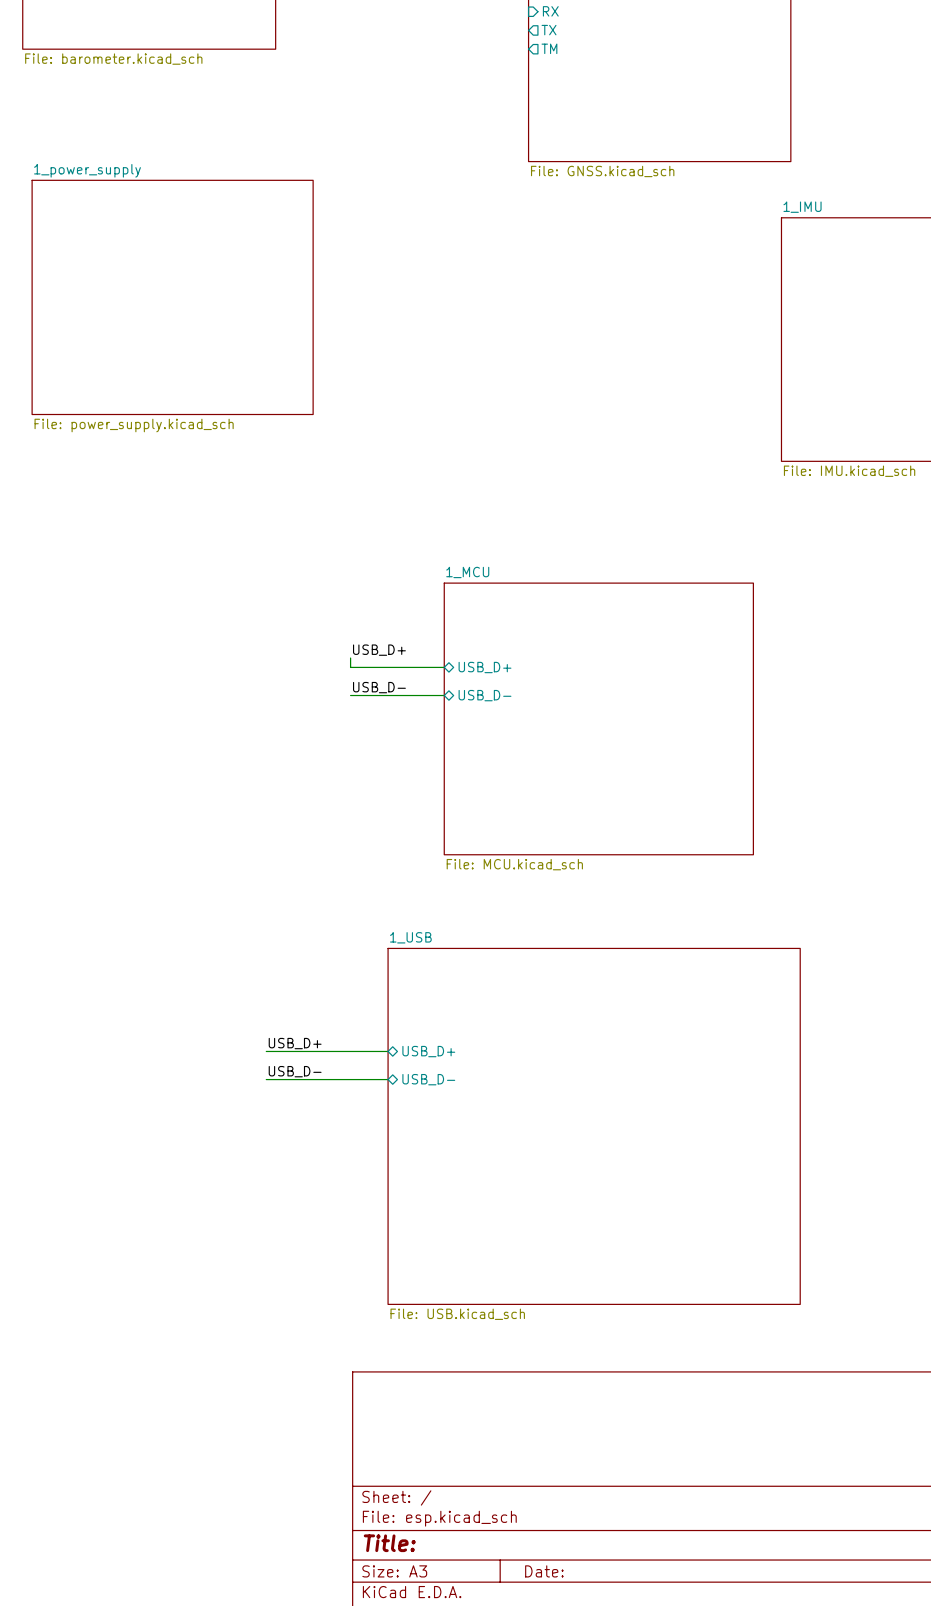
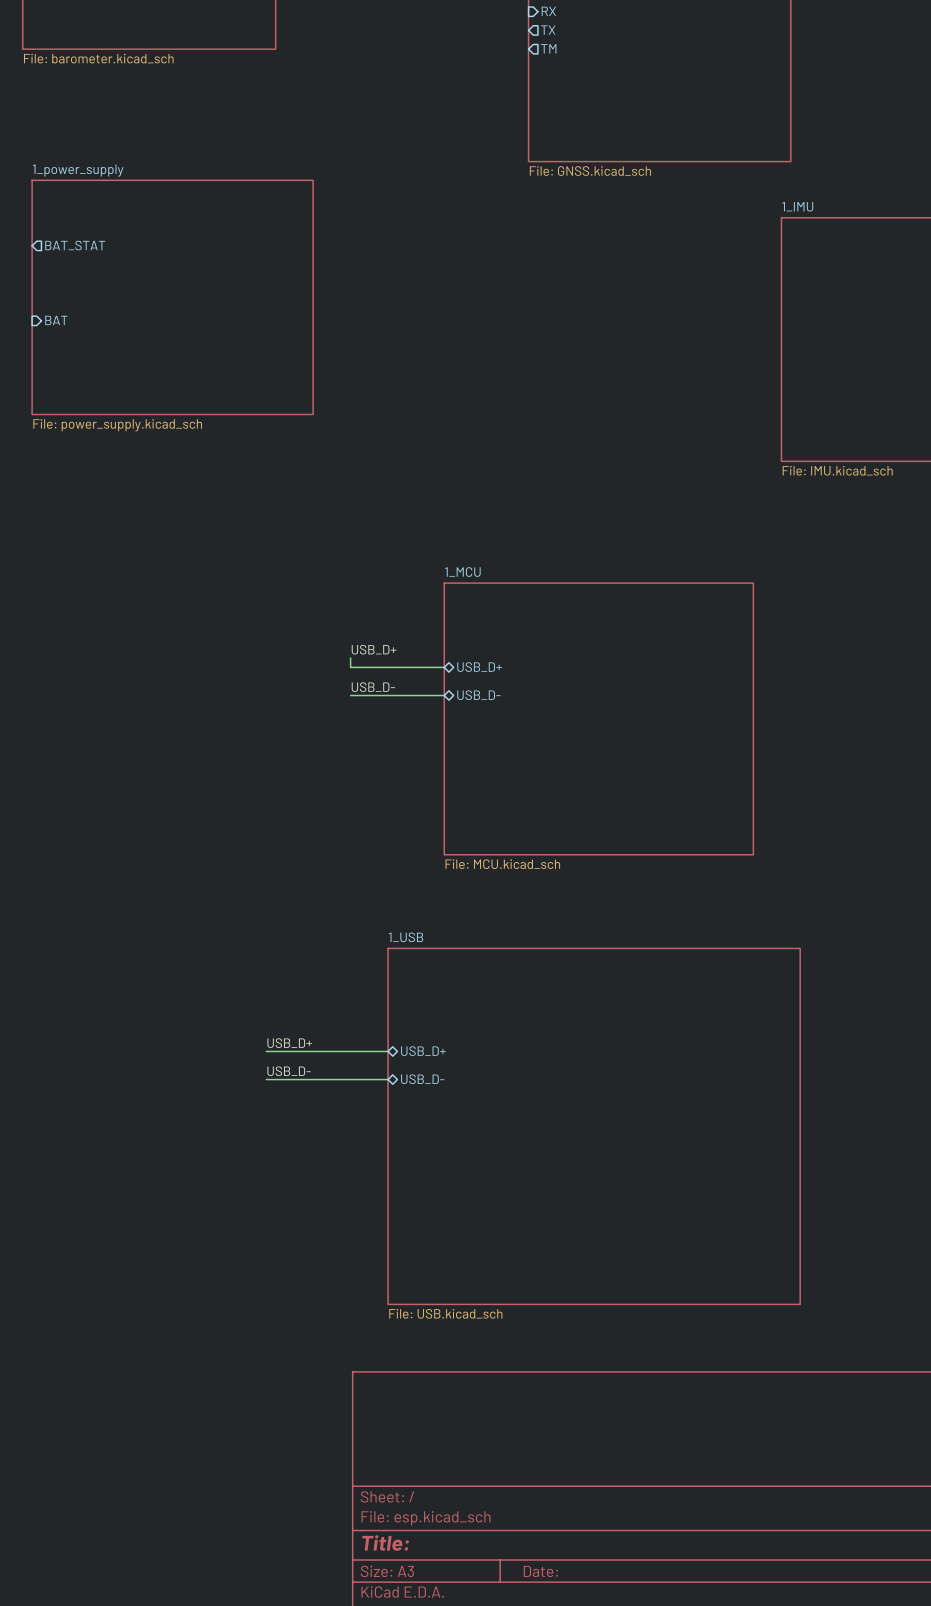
sheet pin: none -> BAT_STAT (75, 245)
sheet pin: none -> BAT (56, 320)

